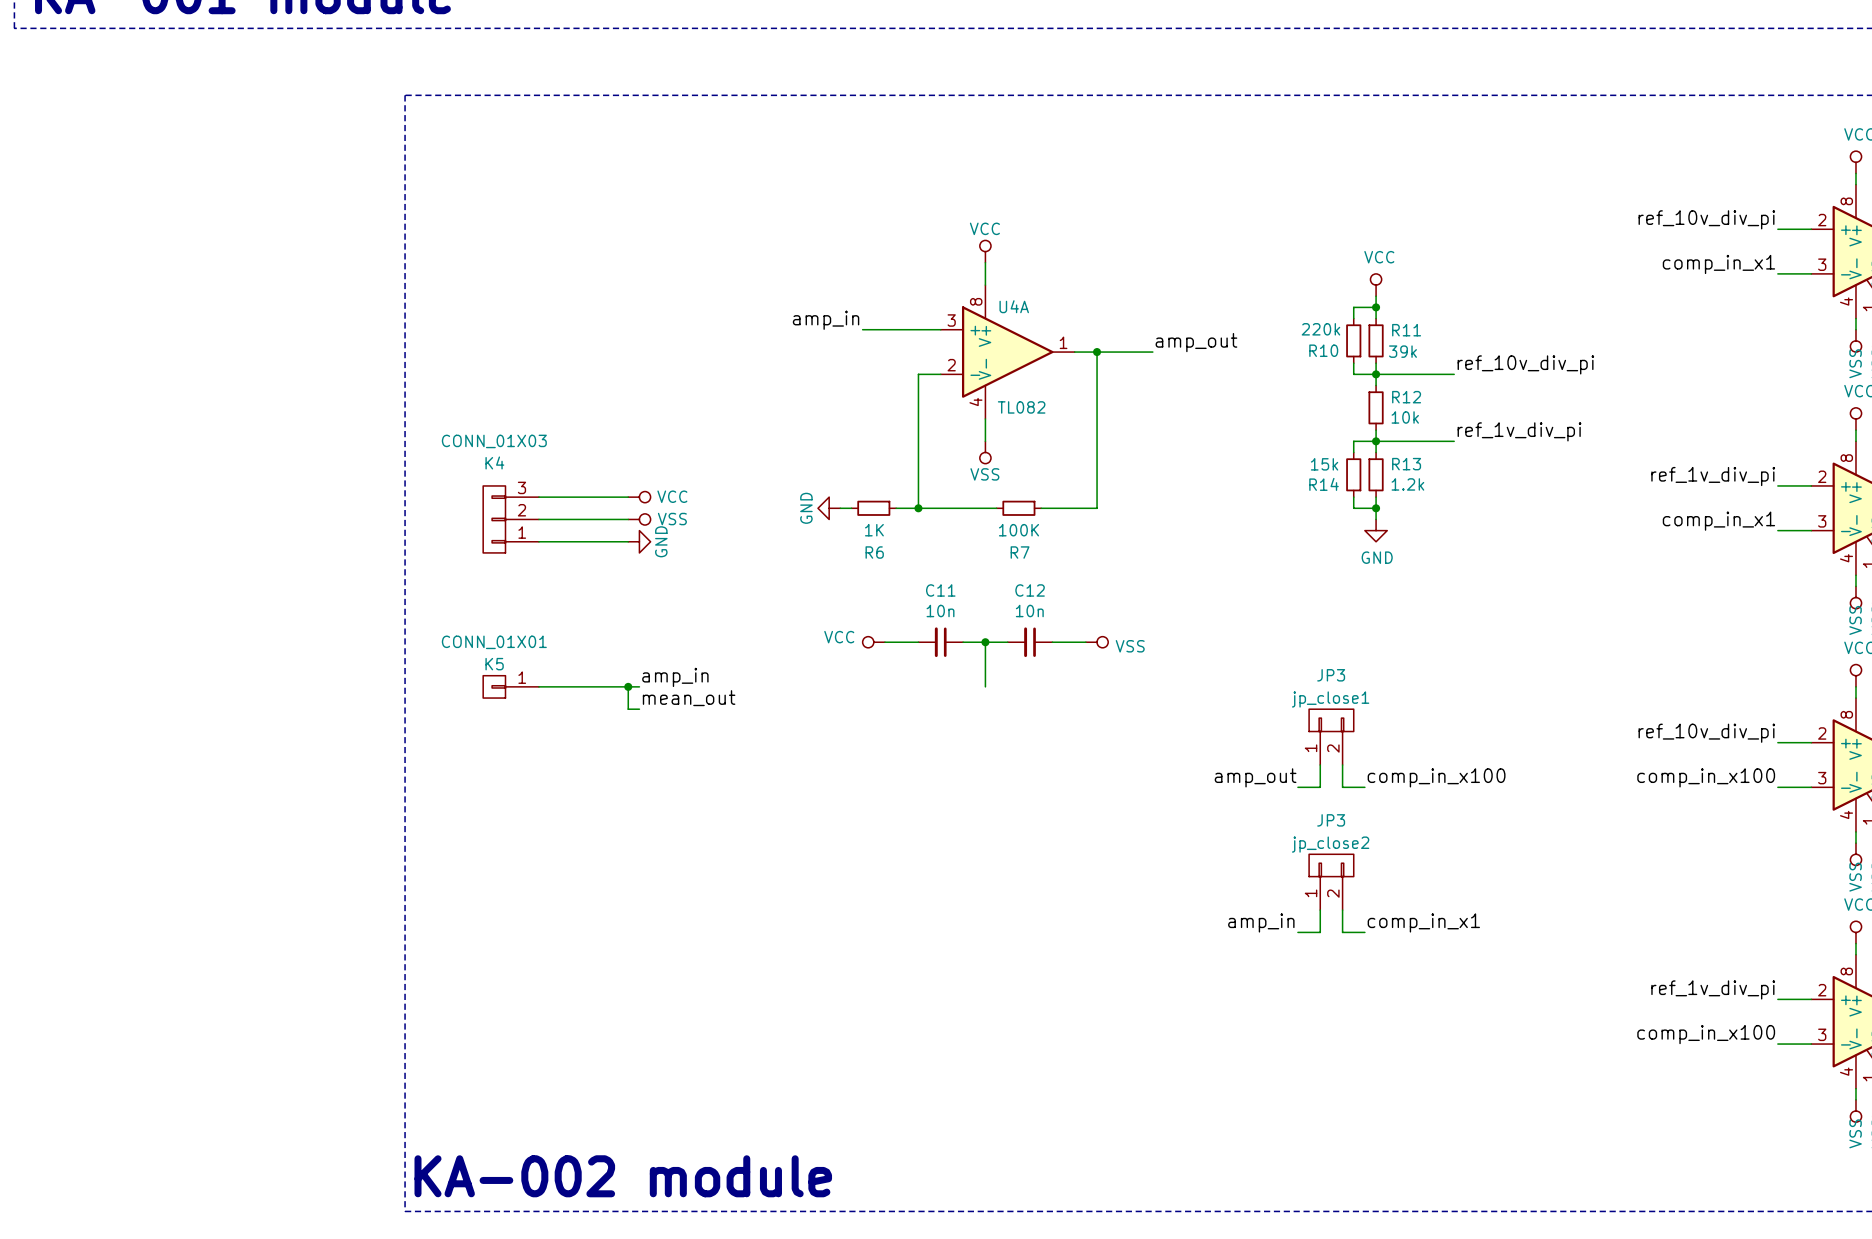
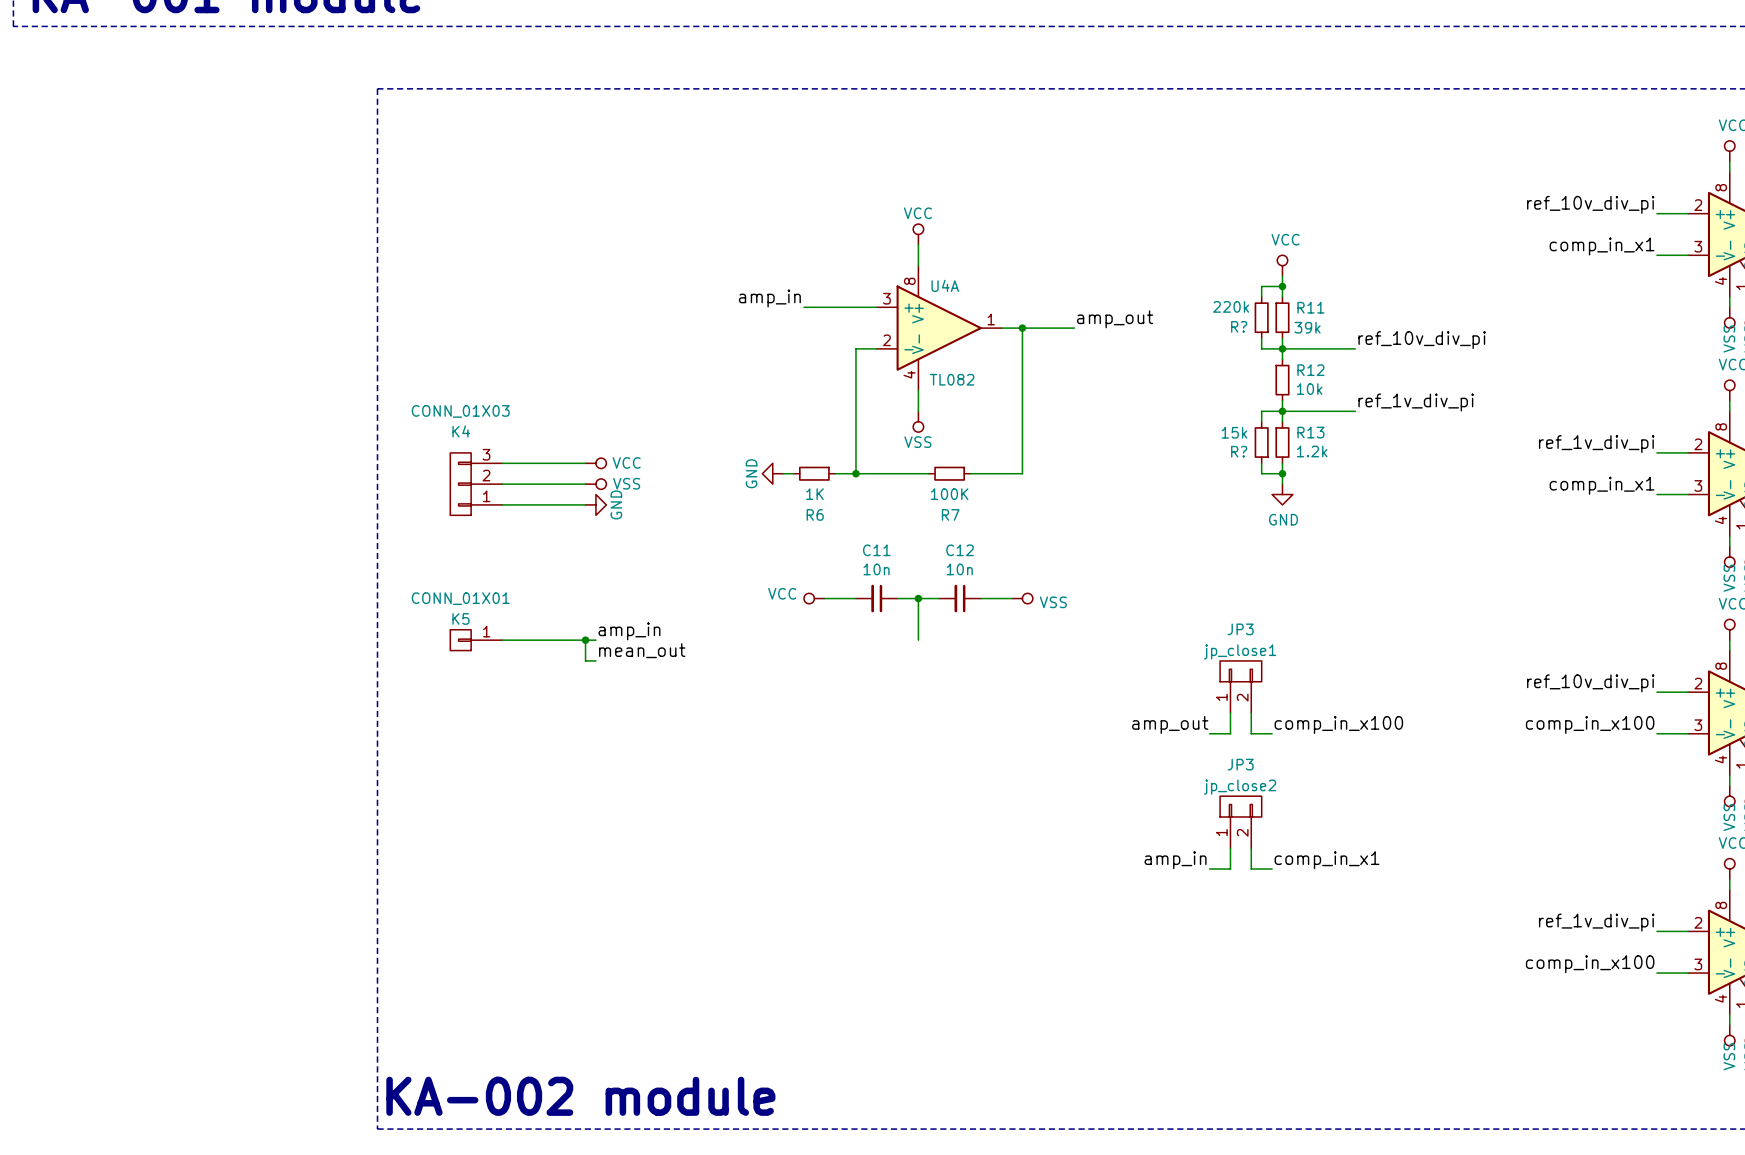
R10 name: R10 (1323, 350) -> R? (1239, 326)
R14 name: R14 (1324, 484) -> R? (1239, 451)

